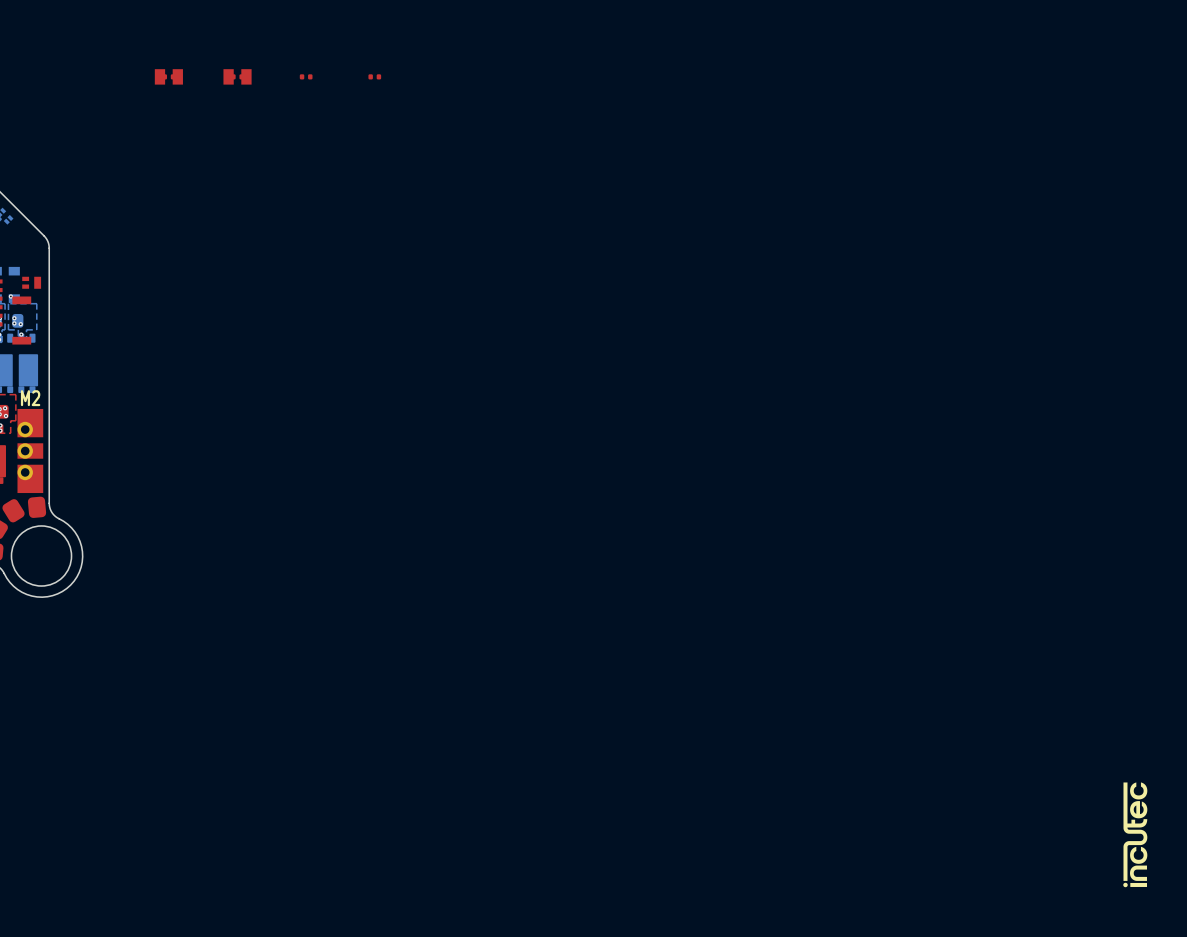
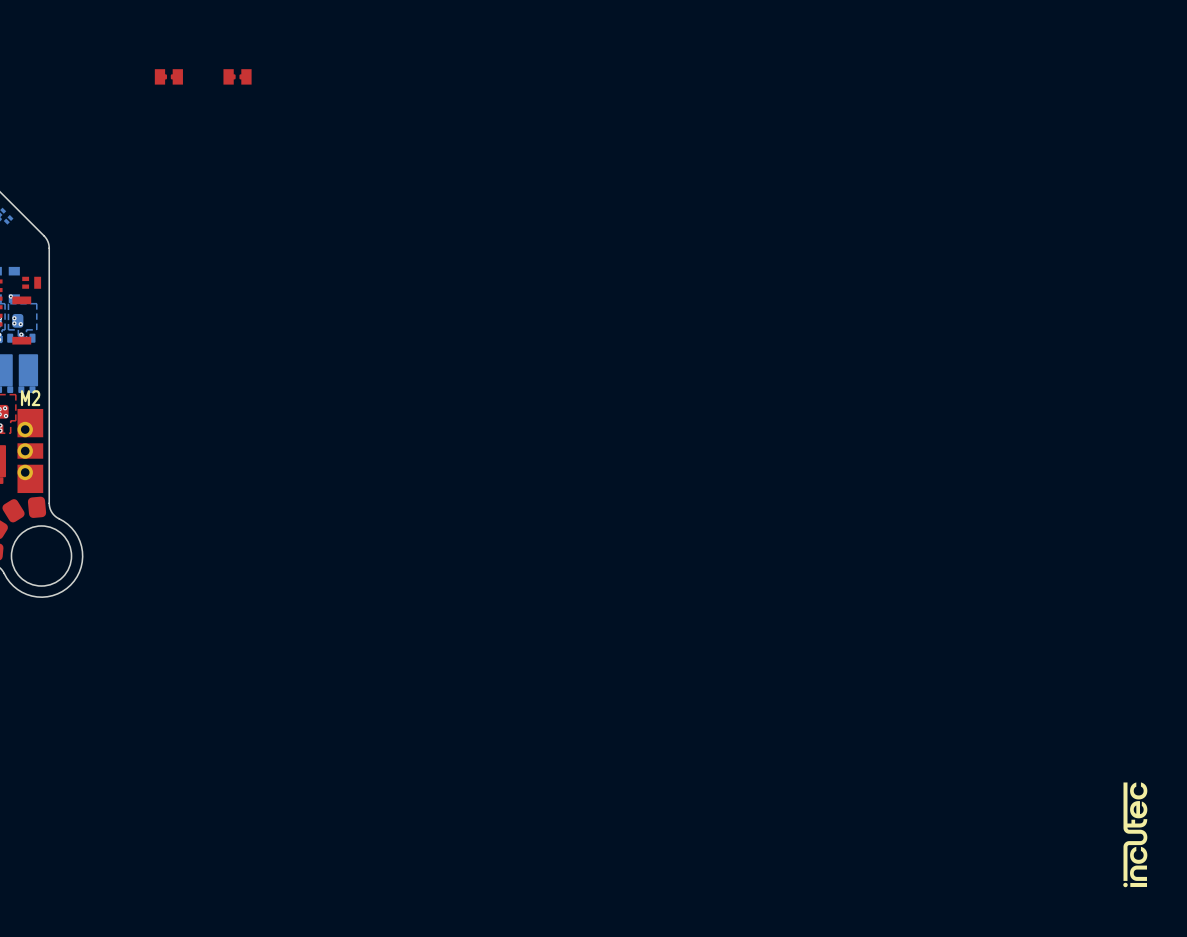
part: (306, 76) -> none
part: (374, 76) -> none

